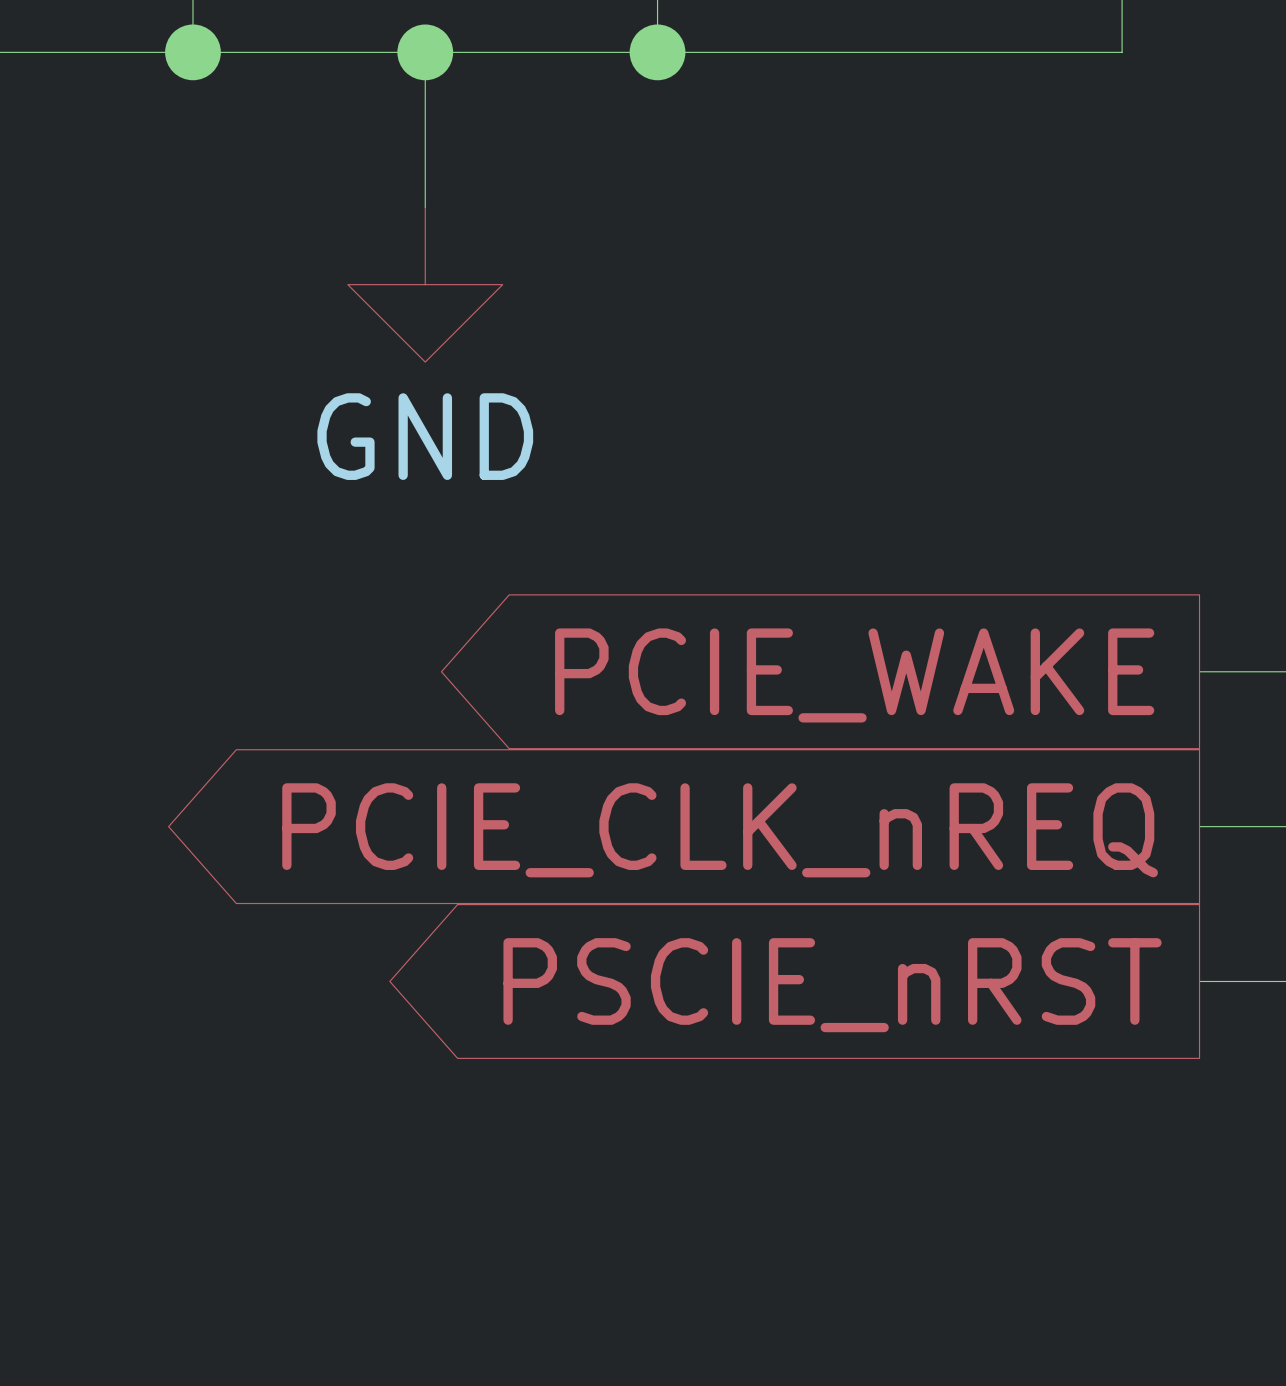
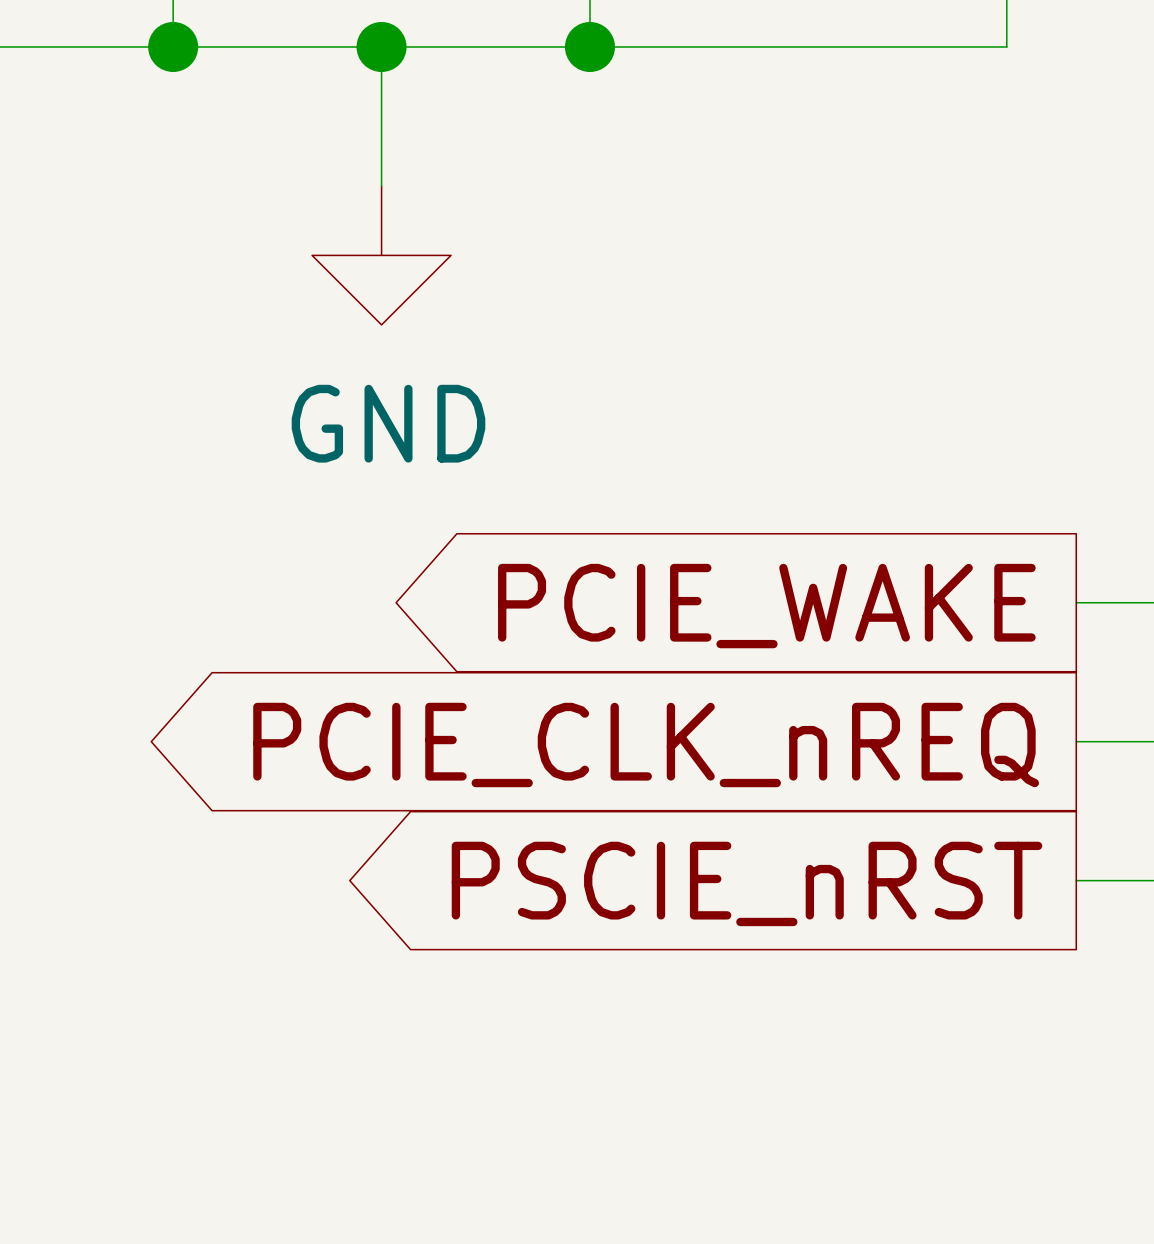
power symbol text position: GND (425, 436) -> GND (388, 423)

